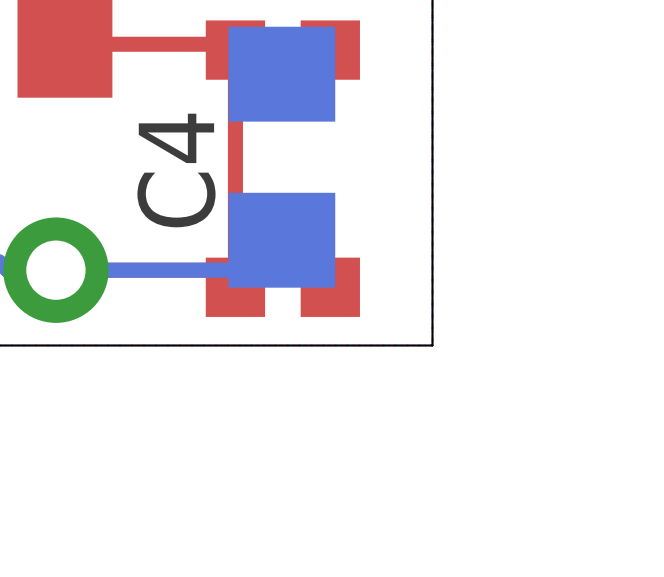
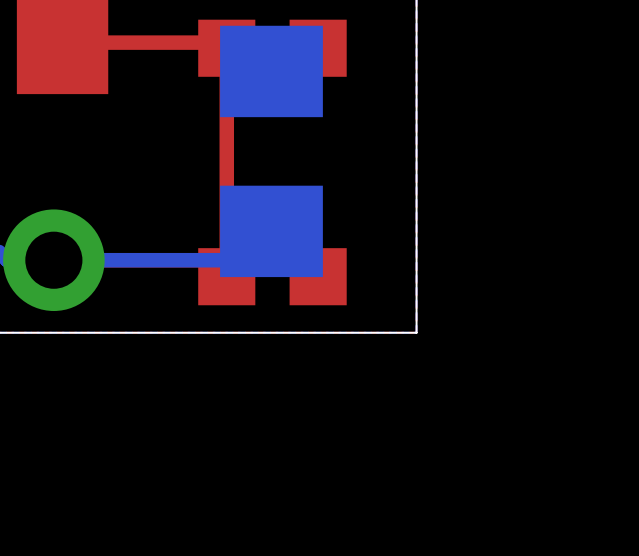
C4 name: C4 (176, 170) -> none

